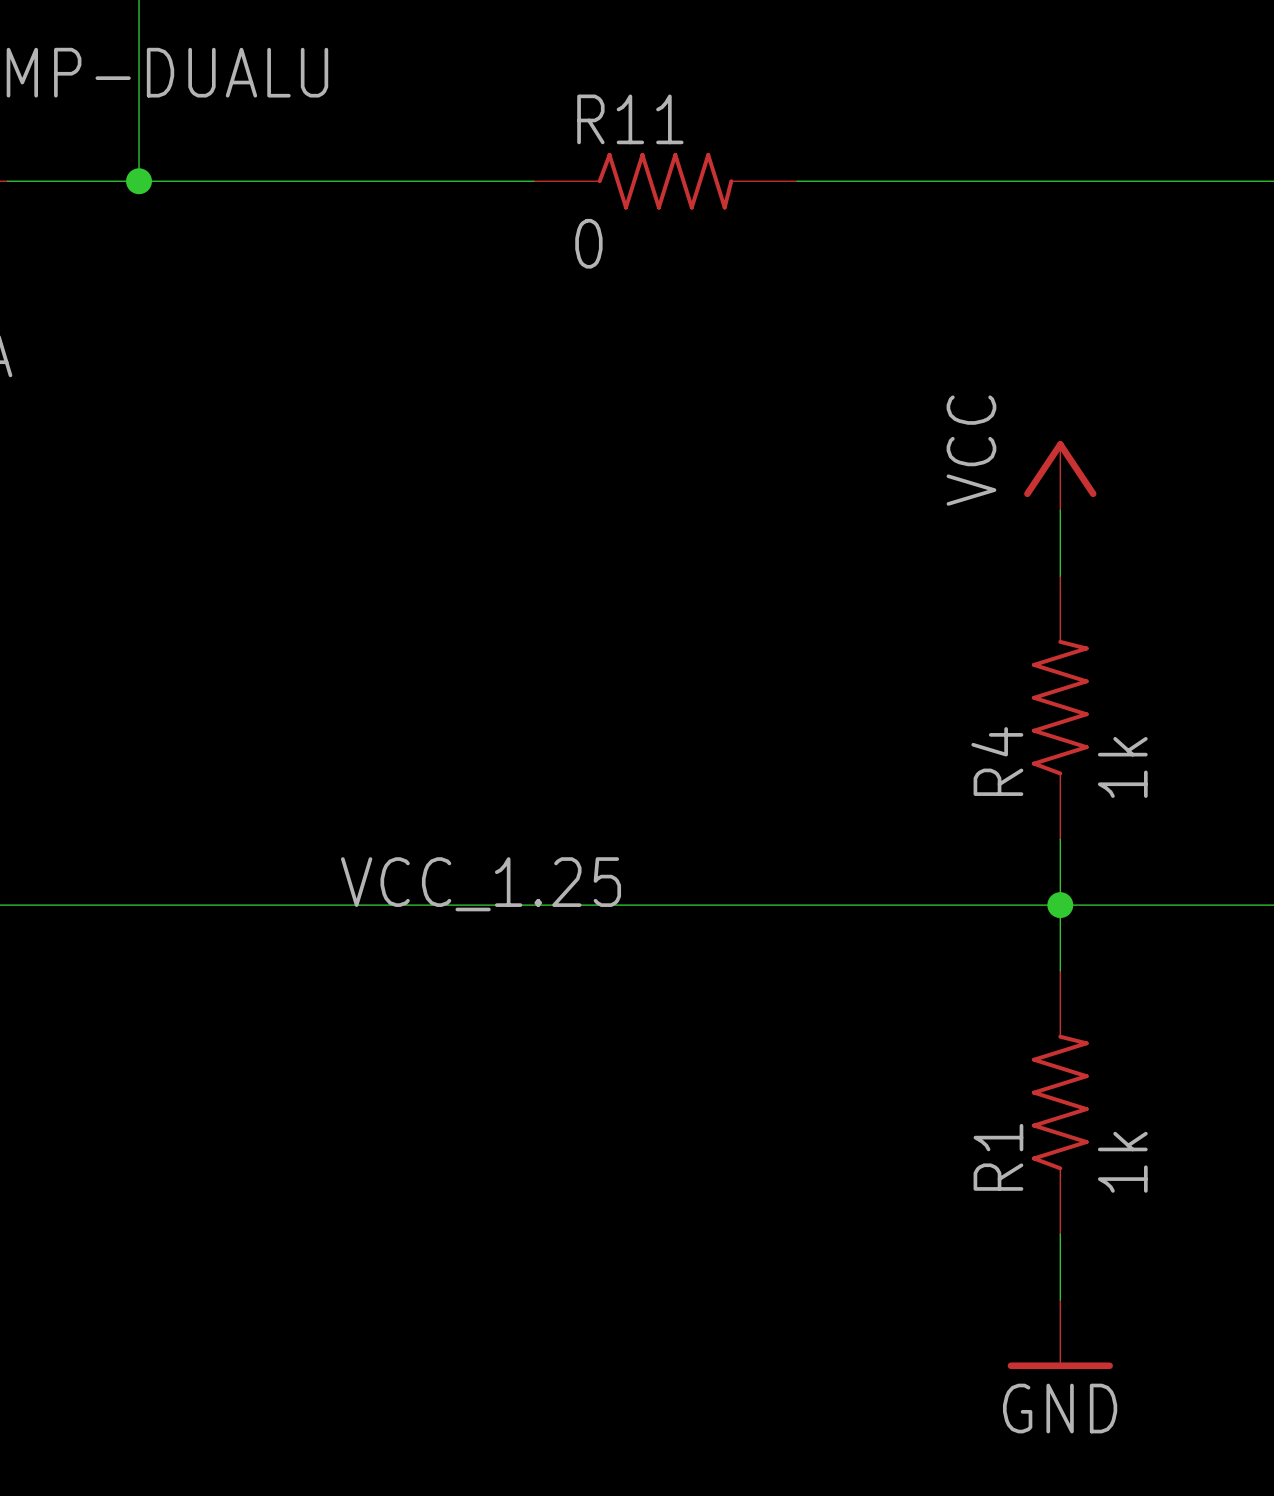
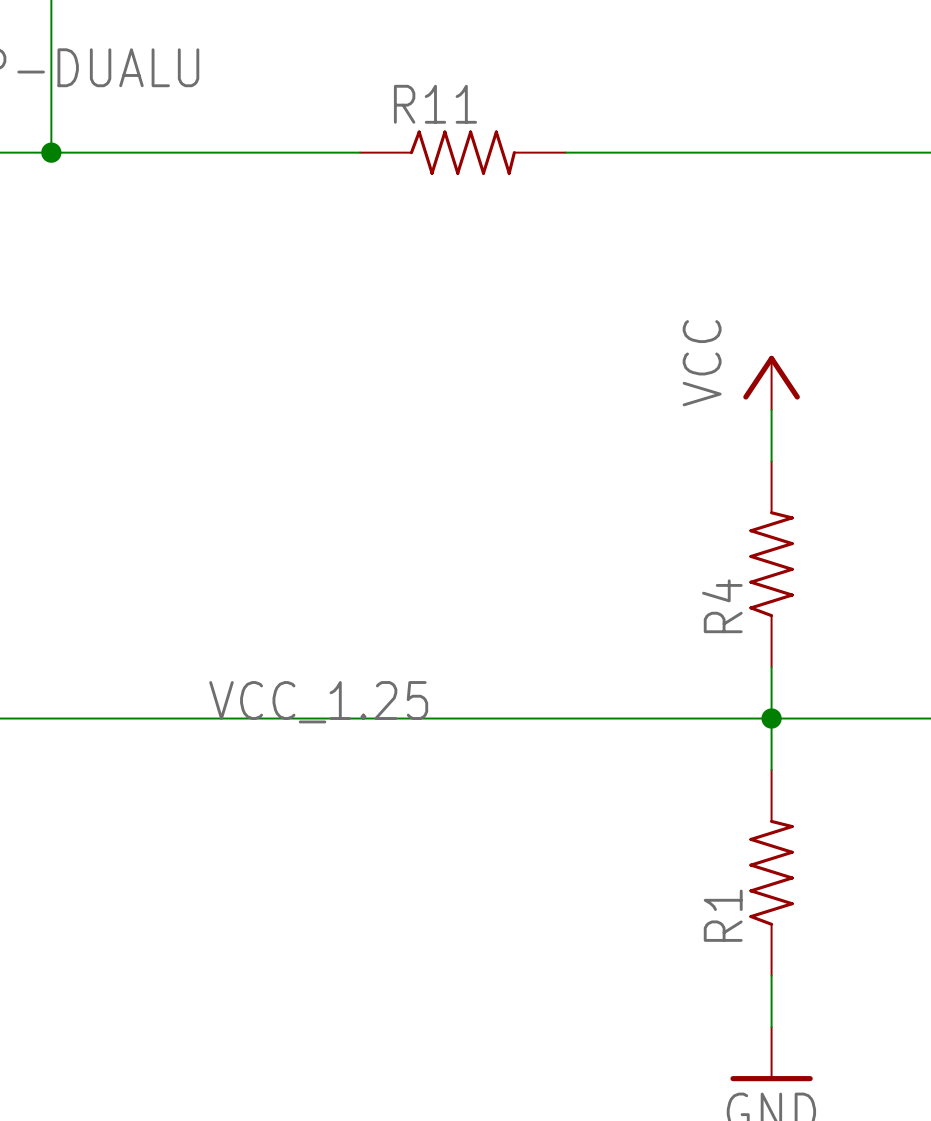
R11 value: 0 (588, 243) -> none
R4 value: 1k (1122, 767) -> none
R1 value: 1k (1122, 1162) -> none

